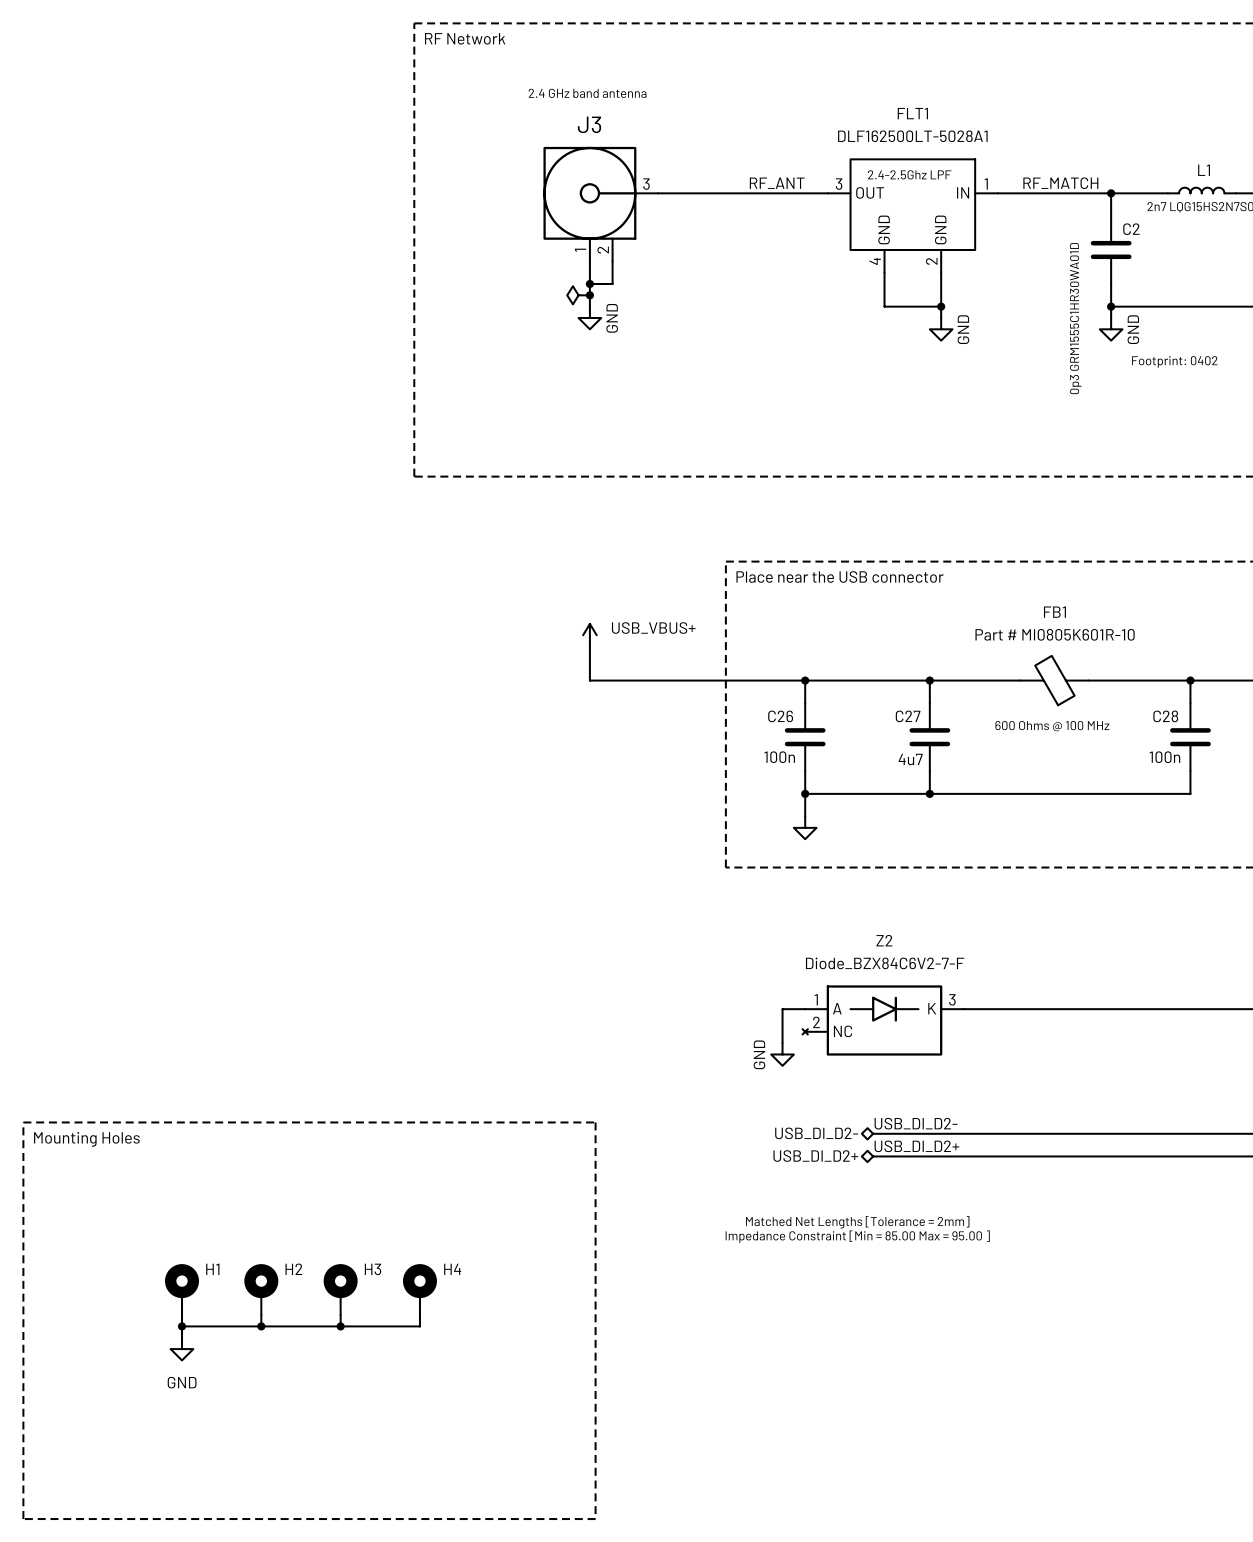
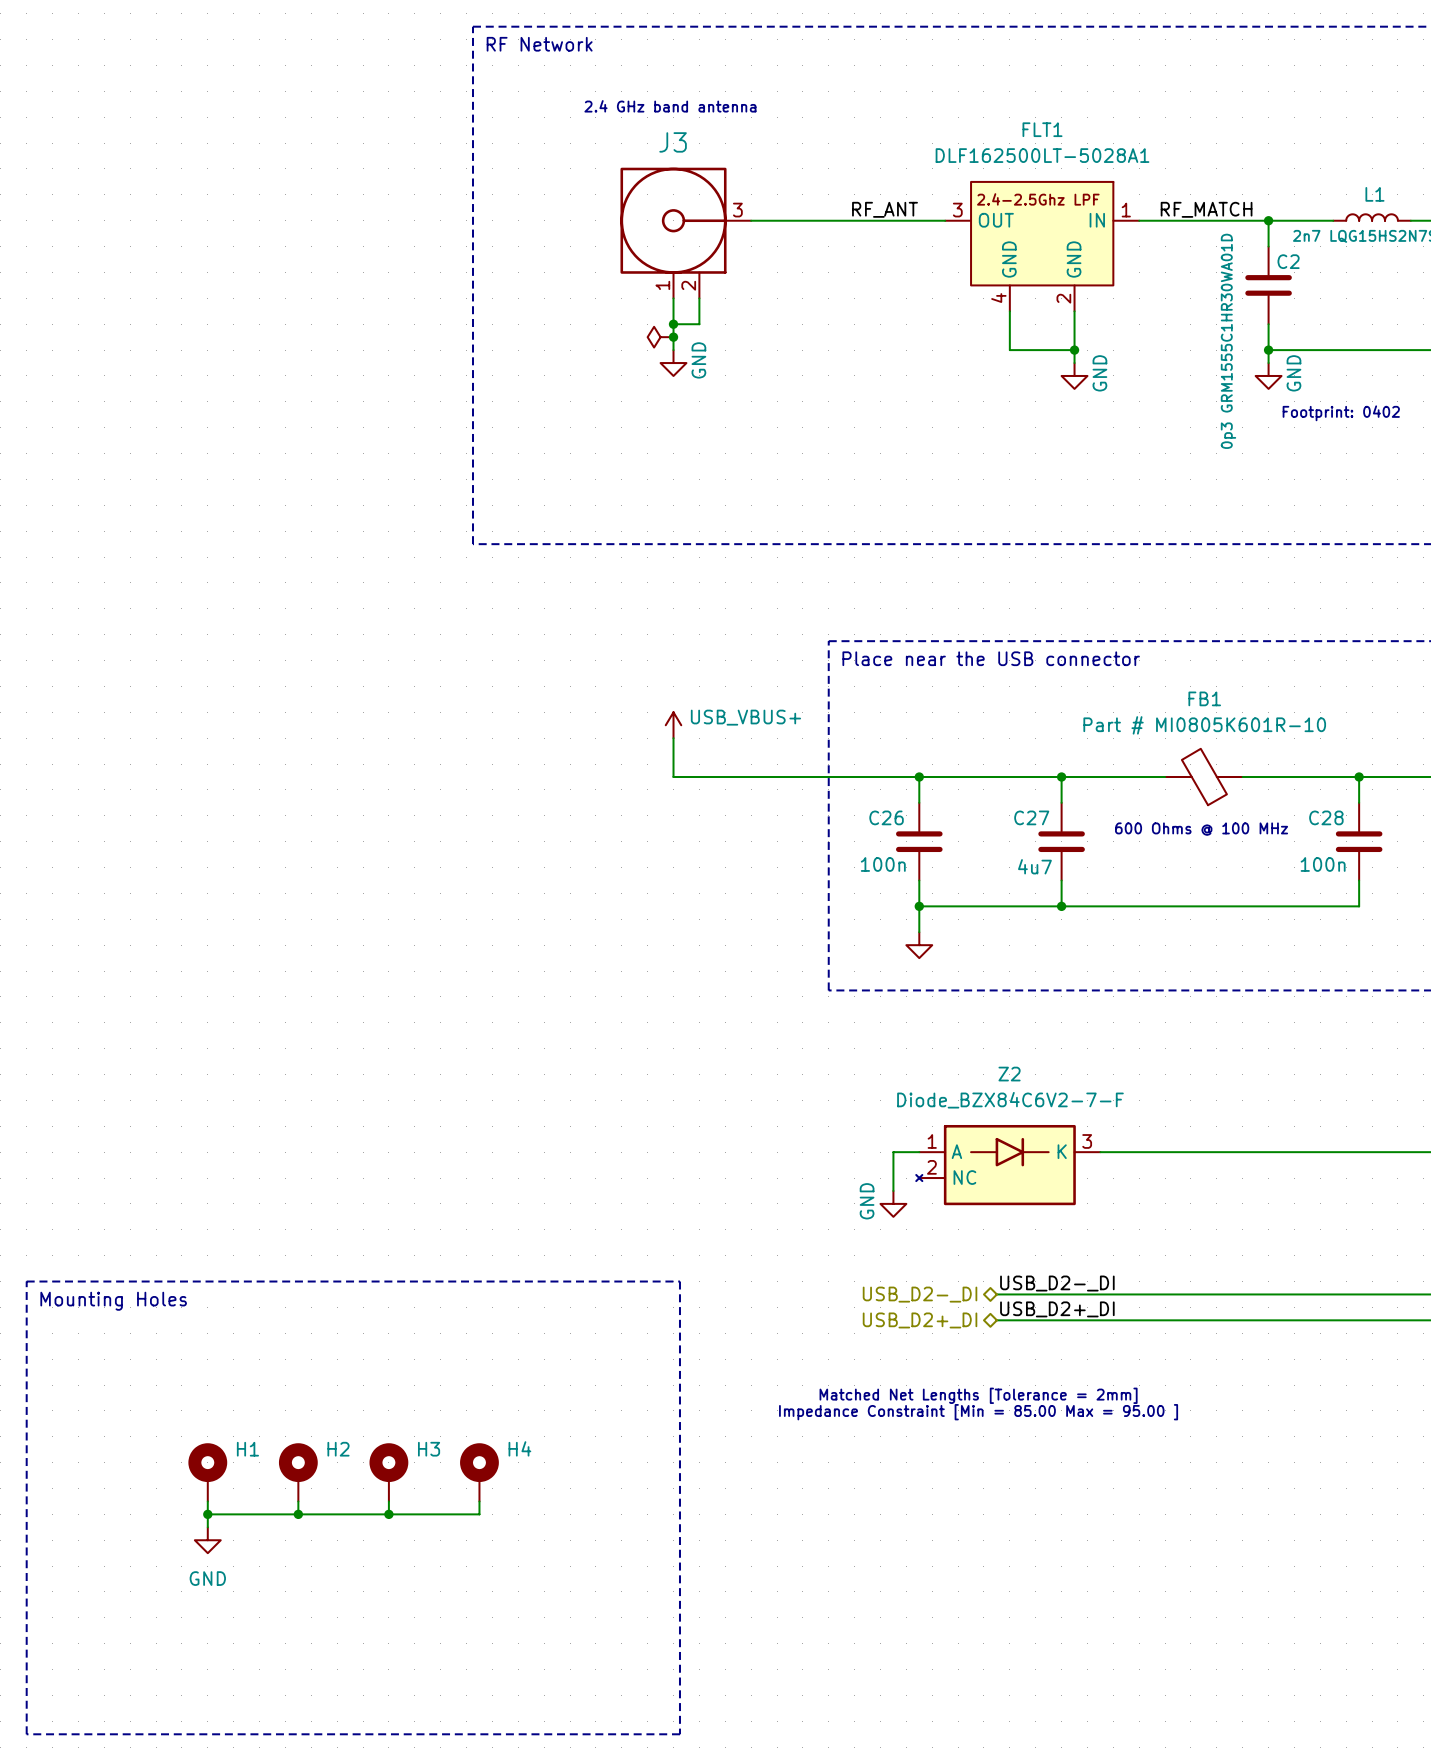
label: USB_DI_D2- (916, 1123) -> USB_D2-_DI (1057, 1283)
hierarchical label: USB_DI_D2- (816, 1133) -> USB_D2-_DI (920, 1294)
label: USB_DI_D2+ (916, 1146) -> USB_D2+_DI (1057, 1309)
hierarchical label: USB_DI_D2+ (815, 1156) -> USB_D2+_DI (920, 1320)

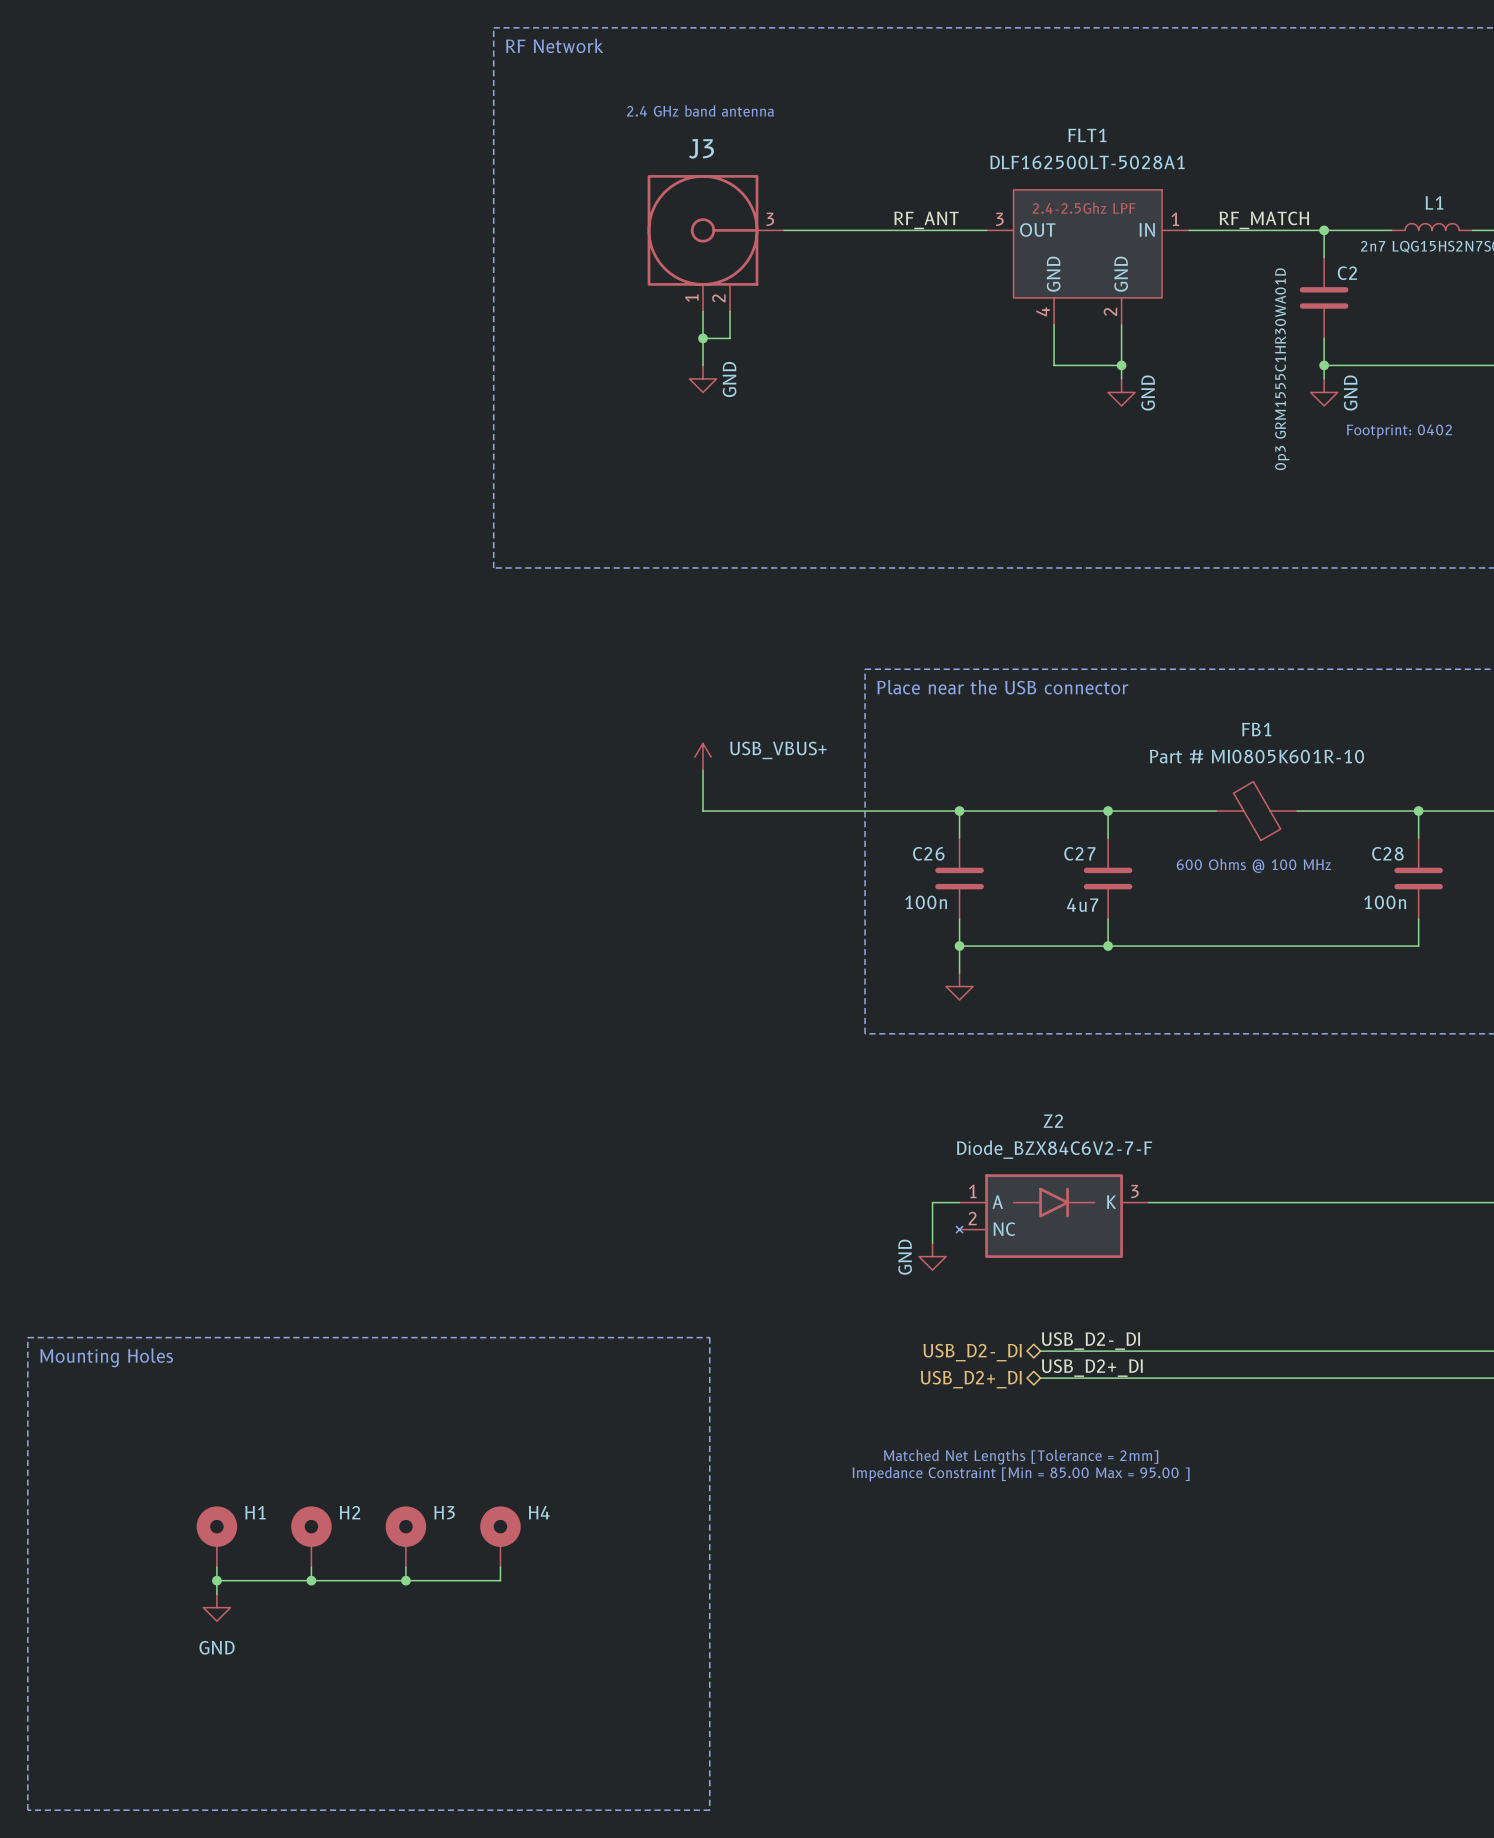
power symbol: (660, 337) -> none
junction: (673, 337) -> none

